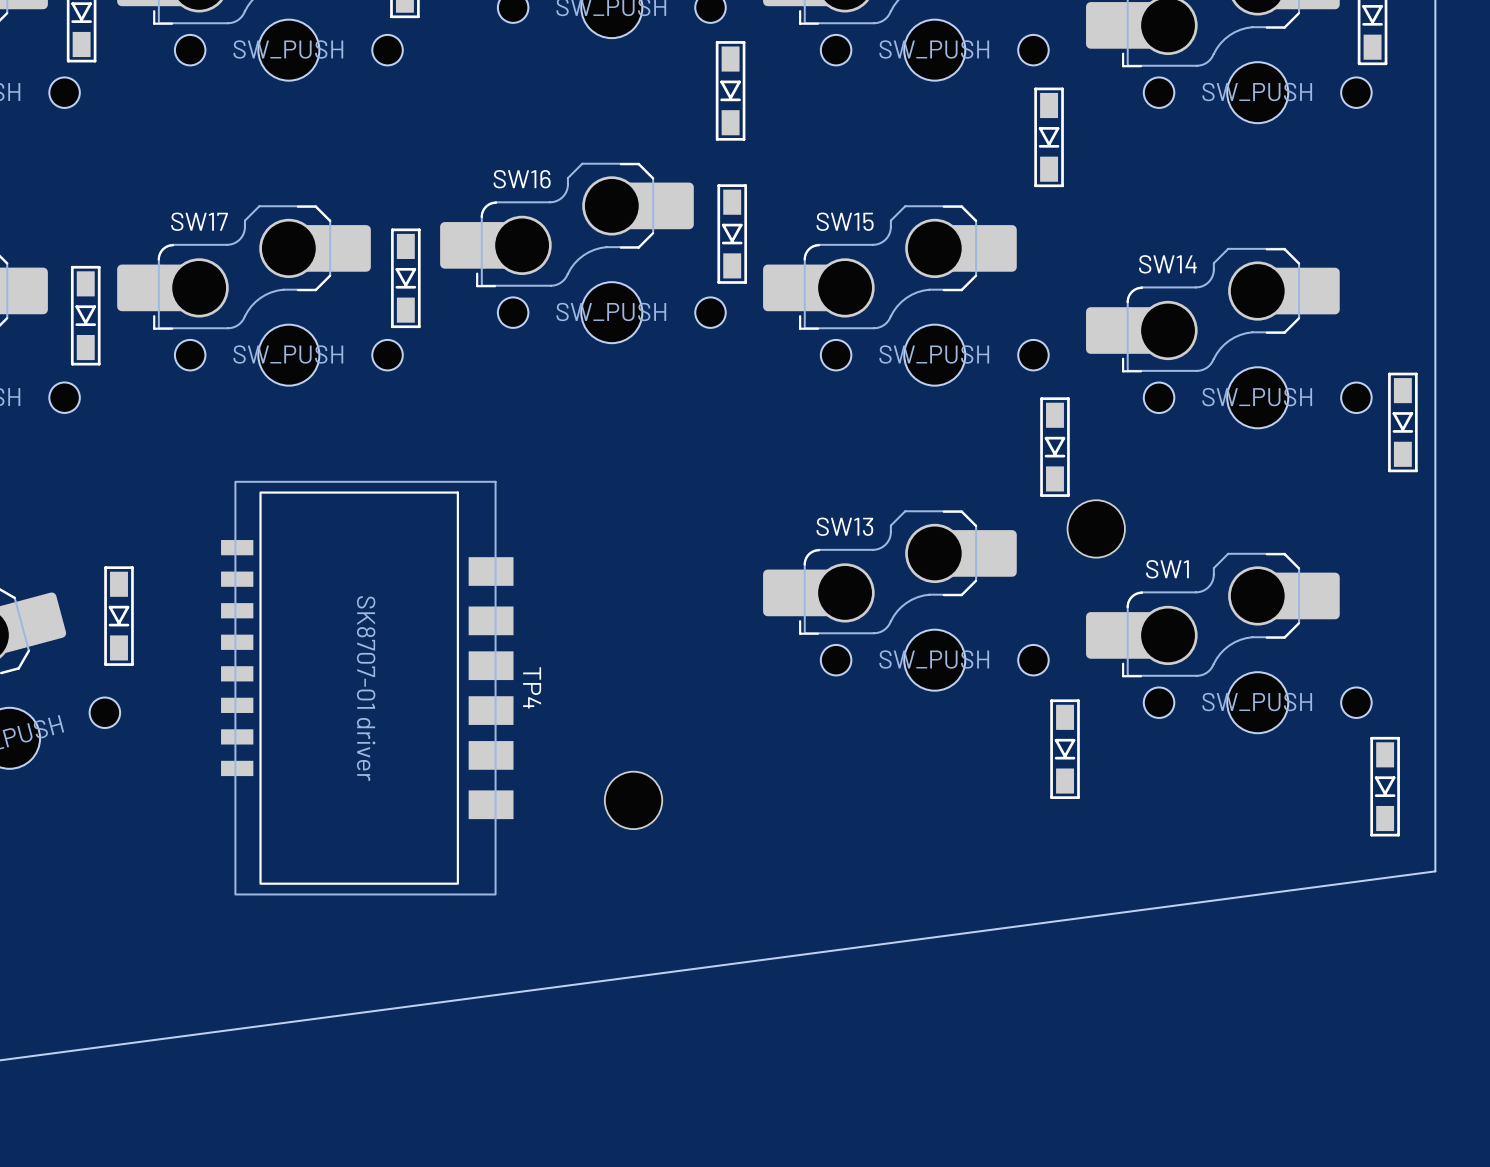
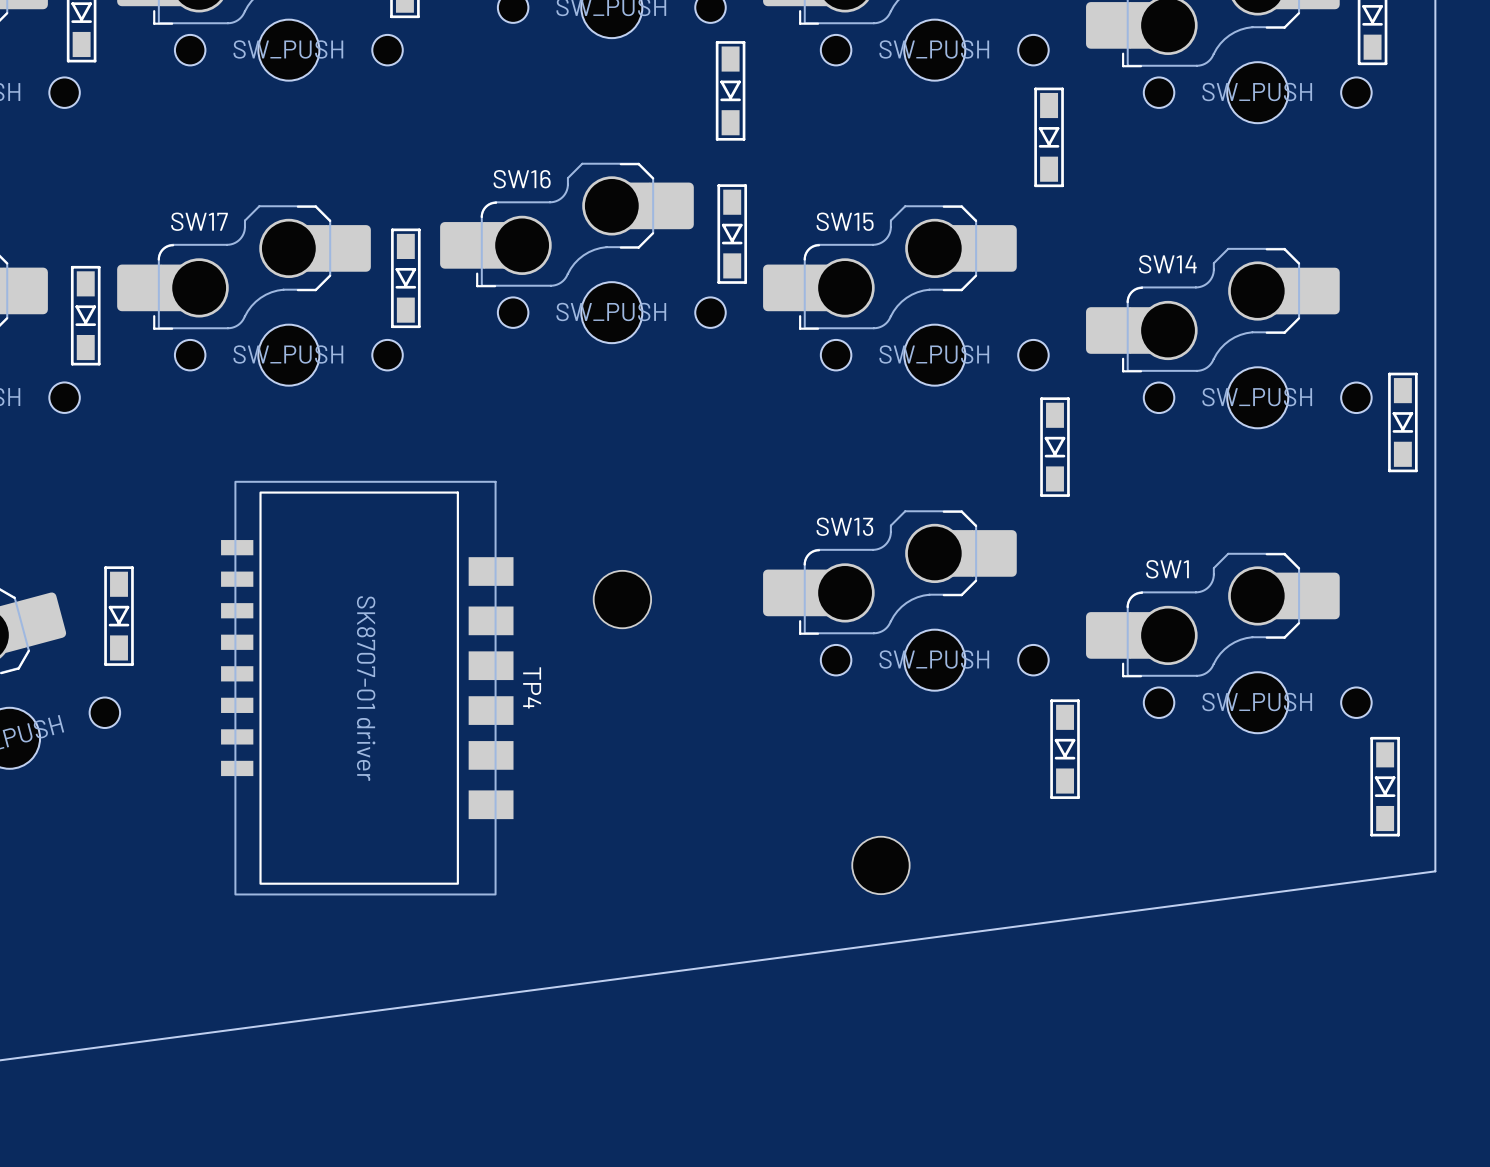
part: (1096, 528) -> none
part: none -> (622, 599)
part: (633, 800) -> none
part: none -> (880, 865)

